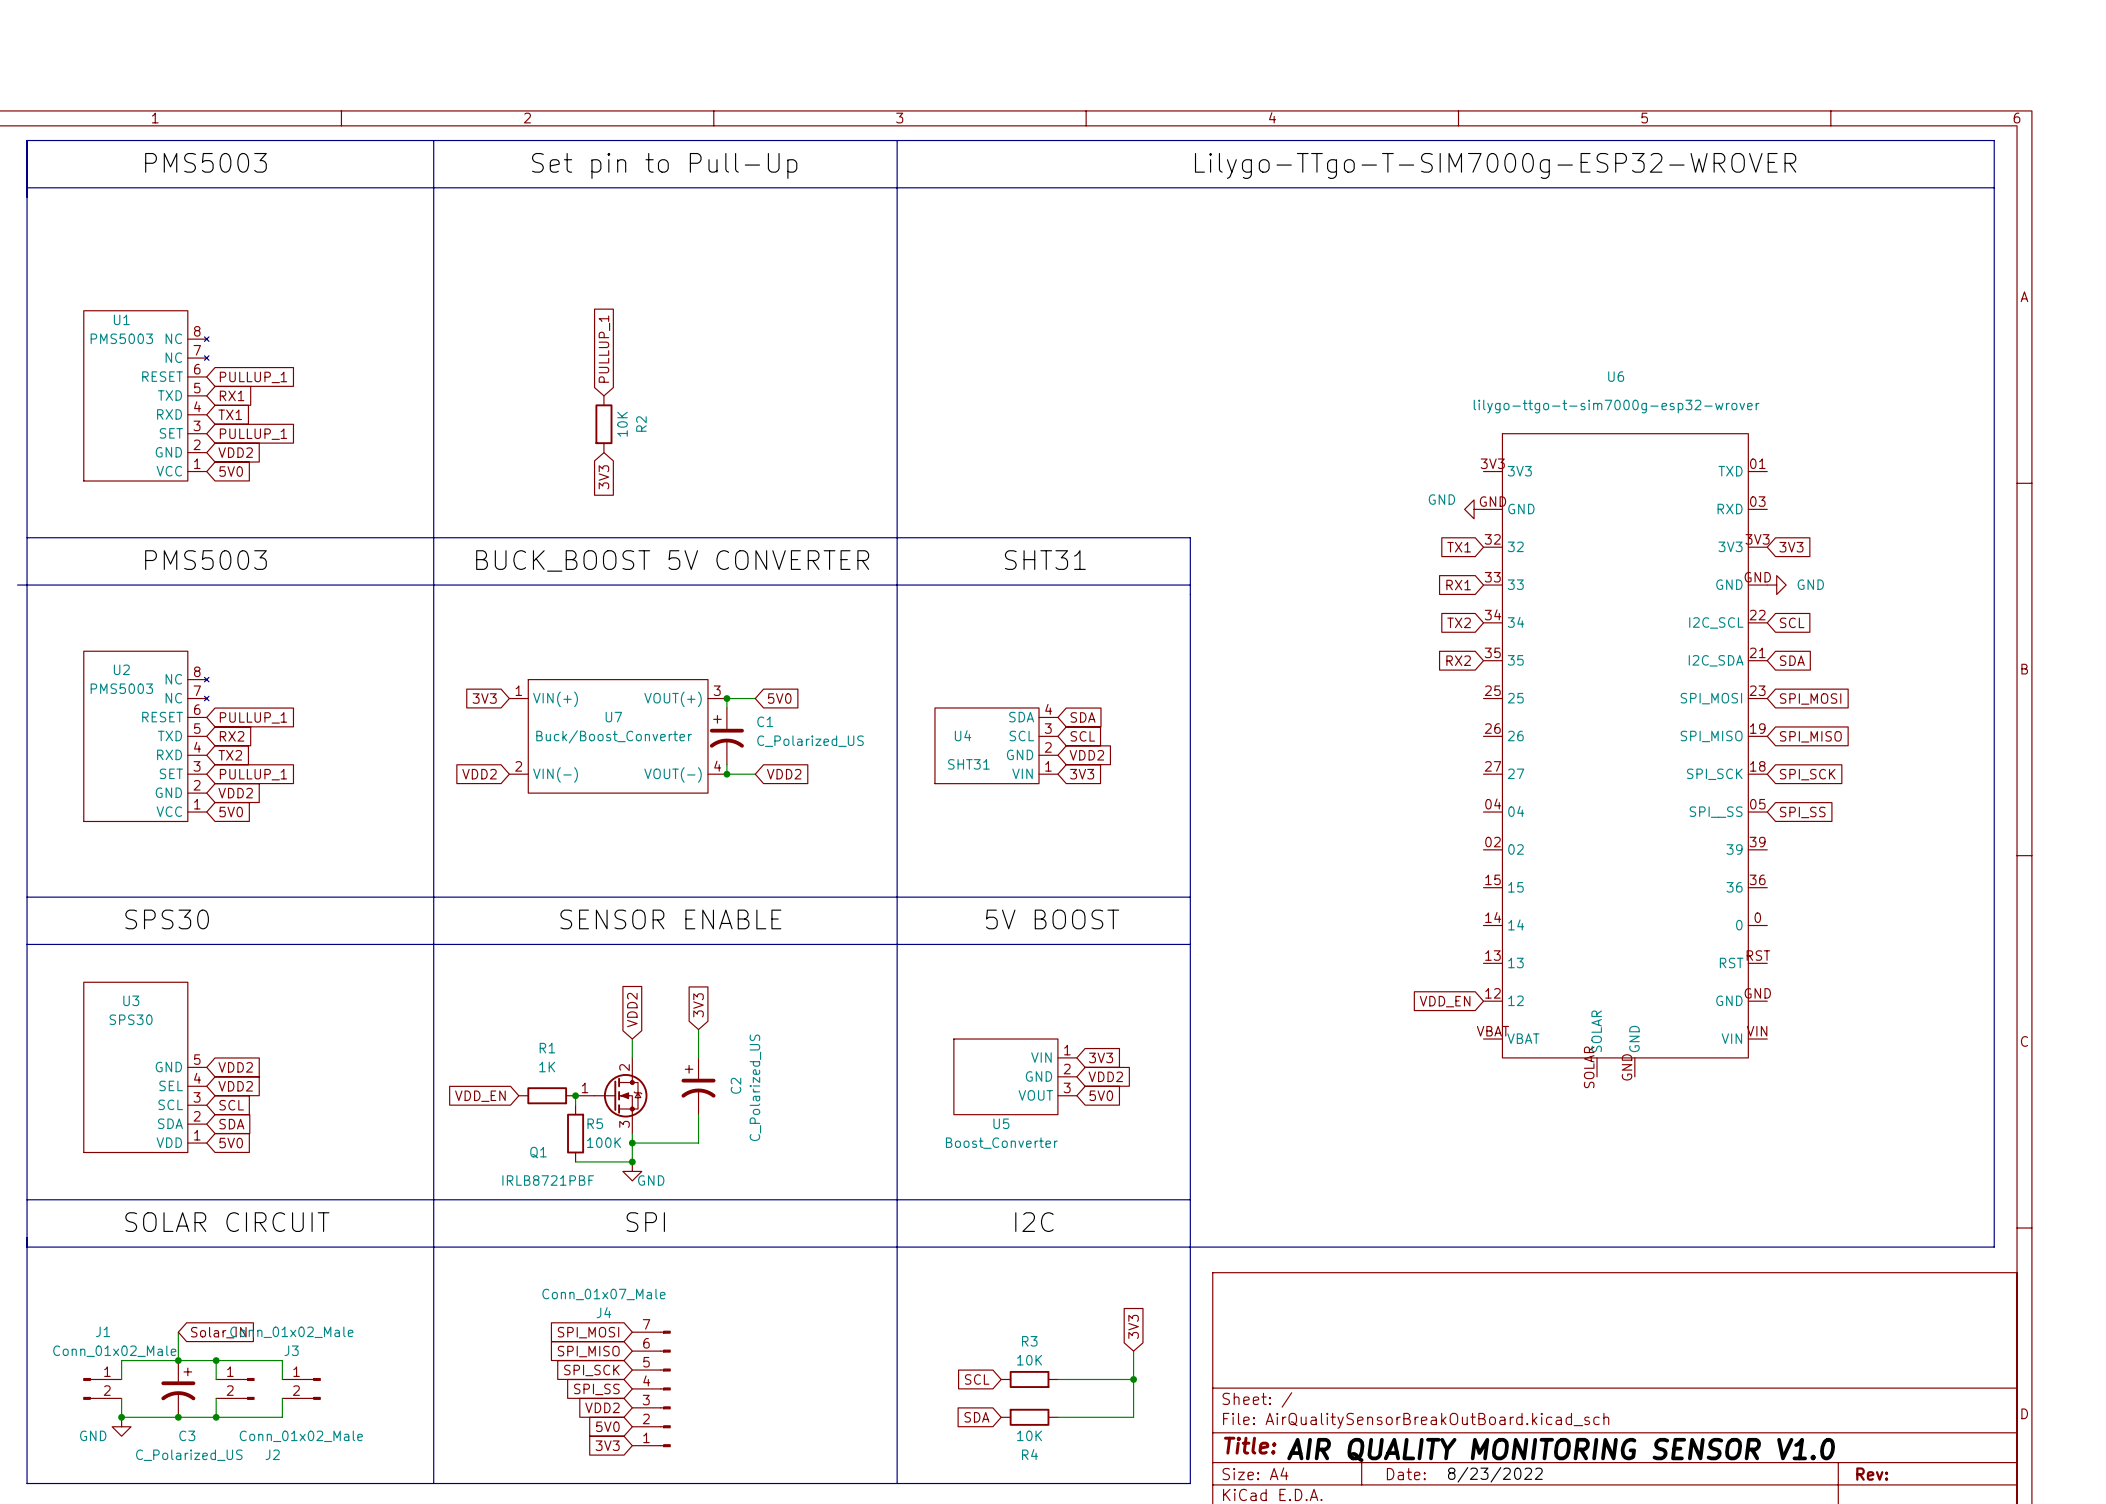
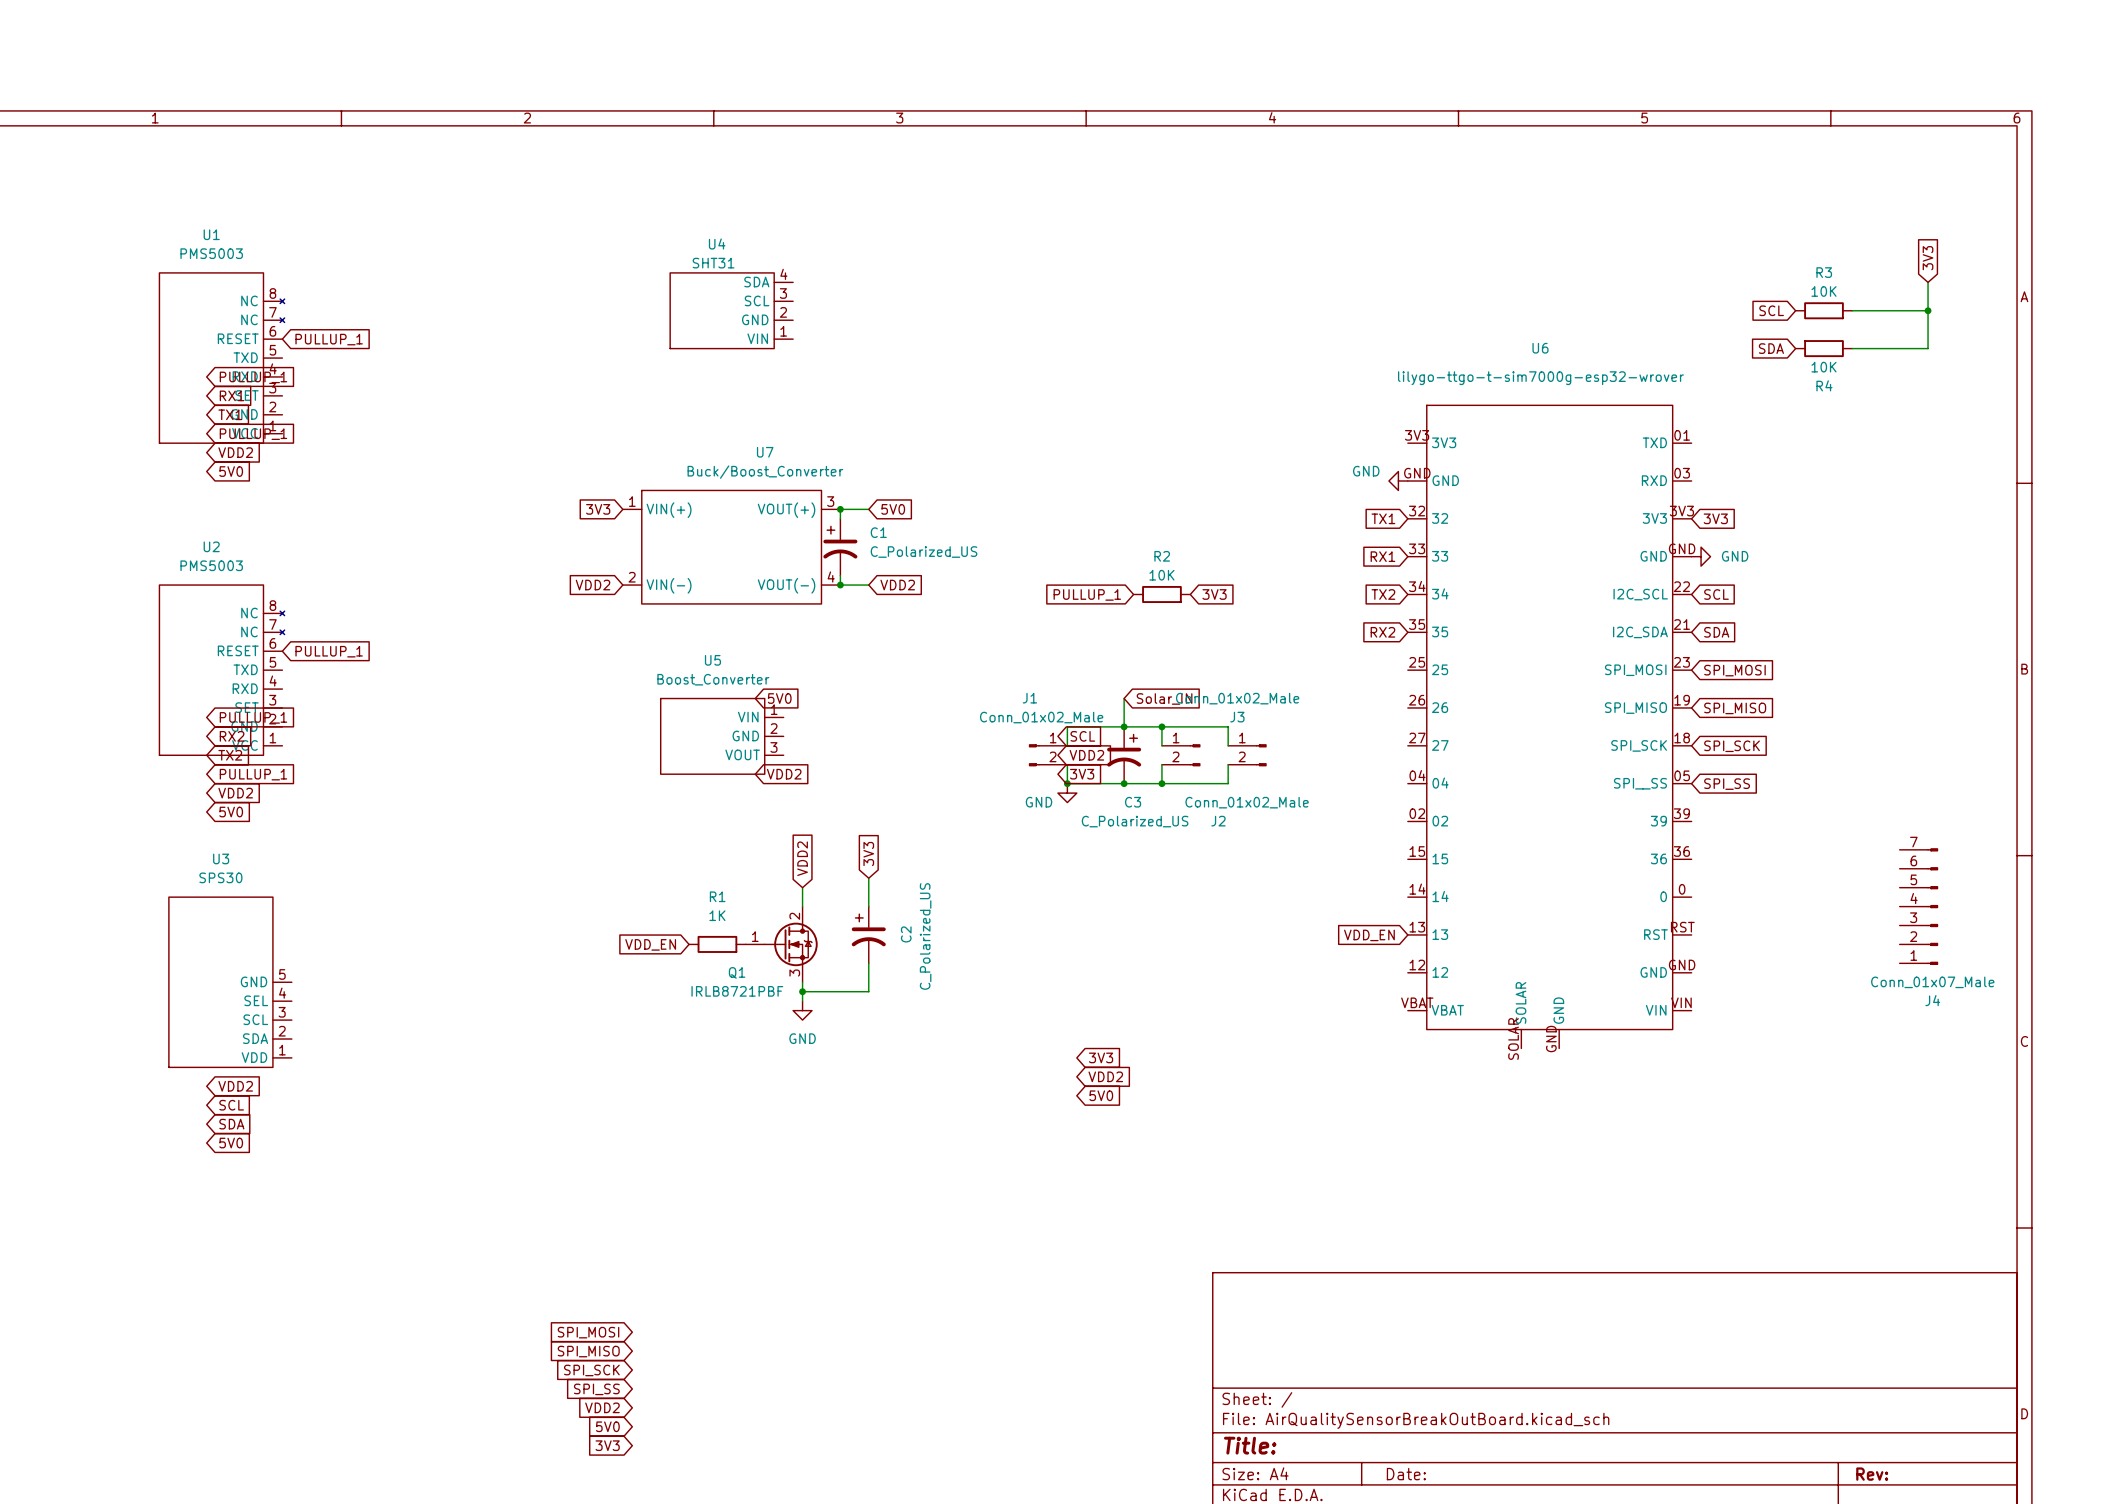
line: (433, 140) (433, 1483) -> none
line: (897, 140) (897, 1483) -> none
label: PMS5003 (205, 162) -> none
label: Set pin to Pull-Up (664, 165) -> none
label: Lilygo-TTgo-T-SIM7000g-ESP32-WROVER (1495, 165) -> none
line: (27, 187) (1994, 187) -> none
global label: none -> 3V3 (1928, 258)
wire: none -> (1928, 282) (1928, 348) (1852, 348)
global label: none -> SCL (1771, 310)
wire: none -> (1852, 310) (1928, 310)
junction: none -> (1928, 310)
U1 name position: U1 (121, 319) -> U1 (211, 234)
U1 value position: PMS5003 (121, 338) -> PMS5003 (211, 253)
global label: none -> PULLUP_1 (329, 339)
global label: none -> SDA (1771, 348)
global label: PULLUP_1 (604, 349) -> none
U1 position: (146, 395) -> (222, 358)
R2 rotation: 0° (603, 424) -> 90° clockwise (1161, 594)
R2 position: (603, 424) -> (1161, 594)
R2 value position: 10K (622, 424) -> 10K (1161, 575)
R2 name position: R2 (641, 424) -> R2 (1162, 556)
global label rotation: 0° (603, 477) -> 90° clockwise (598, 509)
junction: none -> (840, 509)
wire: none -> (868, 509) (840, 509) (840, 518)
global label: none -> 5V0 (893, 509)
power symbol position: GND (1474, 509) -> GND (1398, 481)
line: (27, 537) (1190, 537) (1190, 1483) (27, 1483) (27, 140) (1994, 140) (1994, 1247) (27, 1247) -> none
global label position: TX1 (1459, 547) -> TX1 (1383, 518)
global label position: 3V3 (1791, 547) -> 3V3 (1715, 518)
label: PMS5003 (205, 560) -> none
label: BUCK_BOOST 5V CONVERTER (672, 560) -> none
label: SHT31 (1045, 560) -> none
U6 position: (1786, 561) -> (1710, 533)
line: (17, 585) (1190, 585) -> none
global label: none -> VDD2 (593, 585)
junction: none -> (840, 585)
global label: none -> VDD2 (897, 585)
global label position: RX1 (1458, 585) -> RX1 (1382, 556)
power symbol position: GND (1776, 585) -> GND (1701, 556)
global label: none -> PULLUP_1 (1087, 594)
global label: none -> 3V3 (1214, 594)
global label position: TX2 (1459, 622) -> TX2 (1383, 594)
global label position: SCL (1792, 622) -> SCL (1716, 594)
global label: none -> PULLUP_1 (329, 651)
global label position: RX2 (1458, 660) -> RX2 (1382, 632)
global label position: SDA (1792, 660) -> SDA (1716, 632)
U2 name position: U2 (121, 669) -> U2 (211, 546)
U2 value position: PMS5003 (121, 688) -> PMS5003 (211, 565)
global label: 3V3 (484, 698) -> none
junction: (726, 698) -> none
wire: none -> (1124, 698) (1124, 726)
global label: none -> Solar_IN (1164, 698)
global label position: SPI_MOSI (1810, 698) -> SPI_MOSI (1734, 670)
U7 name position: U7 (613, 717) -> U7 (765, 452)
global label: SDA (1083, 717) -> none
junction: none -> (1124, 726)
wire: none -> (1161, 726) (1161, 745)
junction: none -> (1161, 726)
U4 name position: U4 (963, 735) -> U4 (717, 243)
U2 position: (146, 736) -> (222, 670)
U7 value position: Buck/Boost_Converter (614, 736) -> Buck/Boost_Converter (765, 472)
C1 position: (726, 736) -> (840, 547)
global label position: SPI_MISO (1810, 736) -> SPI_MISO (1735, 708)
U7 position: (641, 741) -> (755, 551)
U4 position: (996, 741) -> (731, 306)
wire: none -> (1067, 745) (1067, 726) (1228, 726) (1228, 745)
U4 value position: SHT31 (968, 764) -> SHT31 (713, 263)
wire: none -> (1067, 764) (1067, 783) (1228, 783) (1228, 764)
wire: none -> (1161, 764) (1161, 783)
global label: VDD2 (479, 774) -> none
junction: (726, 774) -> none
global label position: SPI_SCK (1807, 774) -> SPI_SCK (1732, 746)
junction: none -> (1067, 783)
junction: none -> (1124, 783)
junction: none -> (1161, 783)
power symbol: none -> GND (1067, 793)
global label position: SPI_SS (1802, 812) -> SPI_SS (1727, 784)
global label: none -> 3V3 (868, 854)
global label: none -> VDD2 (802, 858)
wire: none -> (868, 878) (868, 906)
wire: none -> (802, 887) (802, 906)
line: (27, 897) (1190, 897) -> none
label: SPS30 (167, 919) -> none
label: SENSOR ENABLE (670, 919) -> none
label: 5V BOOST (1052, 919) -> none
line: (27, 944) (1190, 944) -> none
global label: none -> VDD_EN (650, 944)
wire: none -> (868, 963) (868, 991) (802, 991)
junction: none -> (802, 991)
U3 name position: U3 (131, 1000) -> U3 (221, 858)
global label position: VDD_EN (1445, 1001) -> VDD_EN (1369, 935)
global label: 3V3 (698, 1005) -> none
global label: VDD2 (632, 1010) -> none
power symbol: none -> GND (802, 1010)
U3 value position: SPS30 (131, 1019) -> SPS30 (220, 877)
wire: (698, 1029) (698, 1057) -> none
wire: (632, 1039) (632, 1057) -> (802, 982) (802, 1001)
U3 position: (145, 1067) -> (230, 982)
global label: VDD2 (235, 1067) -> none
U5 position: (1015, 1076) -> (722, 736)
C2 position: (698, 1086) -> (868, 934)
R1 position: (547, 1095) -> (717, 944)
wire: (575, 1095) (575, 1105) -> none
junction: (575, 1095) -> none
Q1 position: (611, 1095) -> (781, 944)
global label: VDD_EN (480, 1096) -> none
wire: (698, 1114) (698, 1143) (632, 1143) -> none
U5 name position: U5 (1001, 1123) -> U5 (712, 660)
R5: 100K (575, 1133) -> none
wire: (632, 1133) (632, 1161) (575, 1161) -> none
junction: (632, 1143) -> none
U5 value position: Boost_Converter (1001, 1143) -> Boost_Converter (713, 679)
Q1 name position: Q1 (538, 1152) -> Q1 (737, 972)
junction: (632, 1161) -> none
power symbol: GND (632, 1171) -> none
Q1 value position: IRLB8721PBF (548, 1180) -> IRLB8721PBF (737, 991)
line: (27, 1199) (1190, 1199) -> none
label: SOLAR CIRCUIT (227, 1222) -> none
label: SPI (645, 1222) -> none
label: I2C (1034, 1222) -> none
J4 value position: Conn_01x07_Male (603, 1294) -> Conn_01x07_Male (1932, 982)
J4 name position: J4 (603, 1312) -> J4 (1932, 1000)
global label: 3V3 (1133, 1326) -> none
J1 name position: J1 (103, 1331) -> J1 (1029, 698)
wire: (178, 1332) (178, 1360) -> none
global label: Solar_IN (218, 1332) -> none
J1 value position: Conn_01x02_Male (114, 1351) -> Conn_01x02_Male (1041, 717)
wire: (1133, 1351) (1133, 1417) (1057, 1417) -> none
junction: (178, 1360) -> none
wire: (216, 1360) (216, 1379) -> none
junction: (216, 1360) -> none
wire: (121, 1379) (121, 1360) (282, 1360) (282, 1379) -> none
global label: SCL (977, 1379) -> none
R3 position: (1029, 1379) -> (1823, 310)
wire: (1057, 1379) (1133, 1379) -> none
junction: (1133, 1379) -> none
J1 position: (102, 1388) -> (1048, 755)
C3 position: (178, 1388) -> (1124, 755)
J2 position: (235, 1388) -> (1181, 755)
J3 position: (301, 1388) -> (1247, 755)
J4 position: (651, 1388) -> (1918, 906)
wire: (121, 1398) (121, 1417) (282, 1417) (282, 1398) -> none
wire: (216, 1398) (216, 1417) -> none
junction: (121, 1417) -> none
junction: (178, 1417) -> none
junction: (216, 1417) -> none
global label: SDA (976, 1417) -> none
R4 position: (1029, 1417) -> (1823, 348)
power symbol: GND (121, 1426) -> none
label: AIR QUALITY MONITORING SENSOR V1.0 (1561, 1449) -> none
label: 8/23/2022 (1495, 1474) -> none

